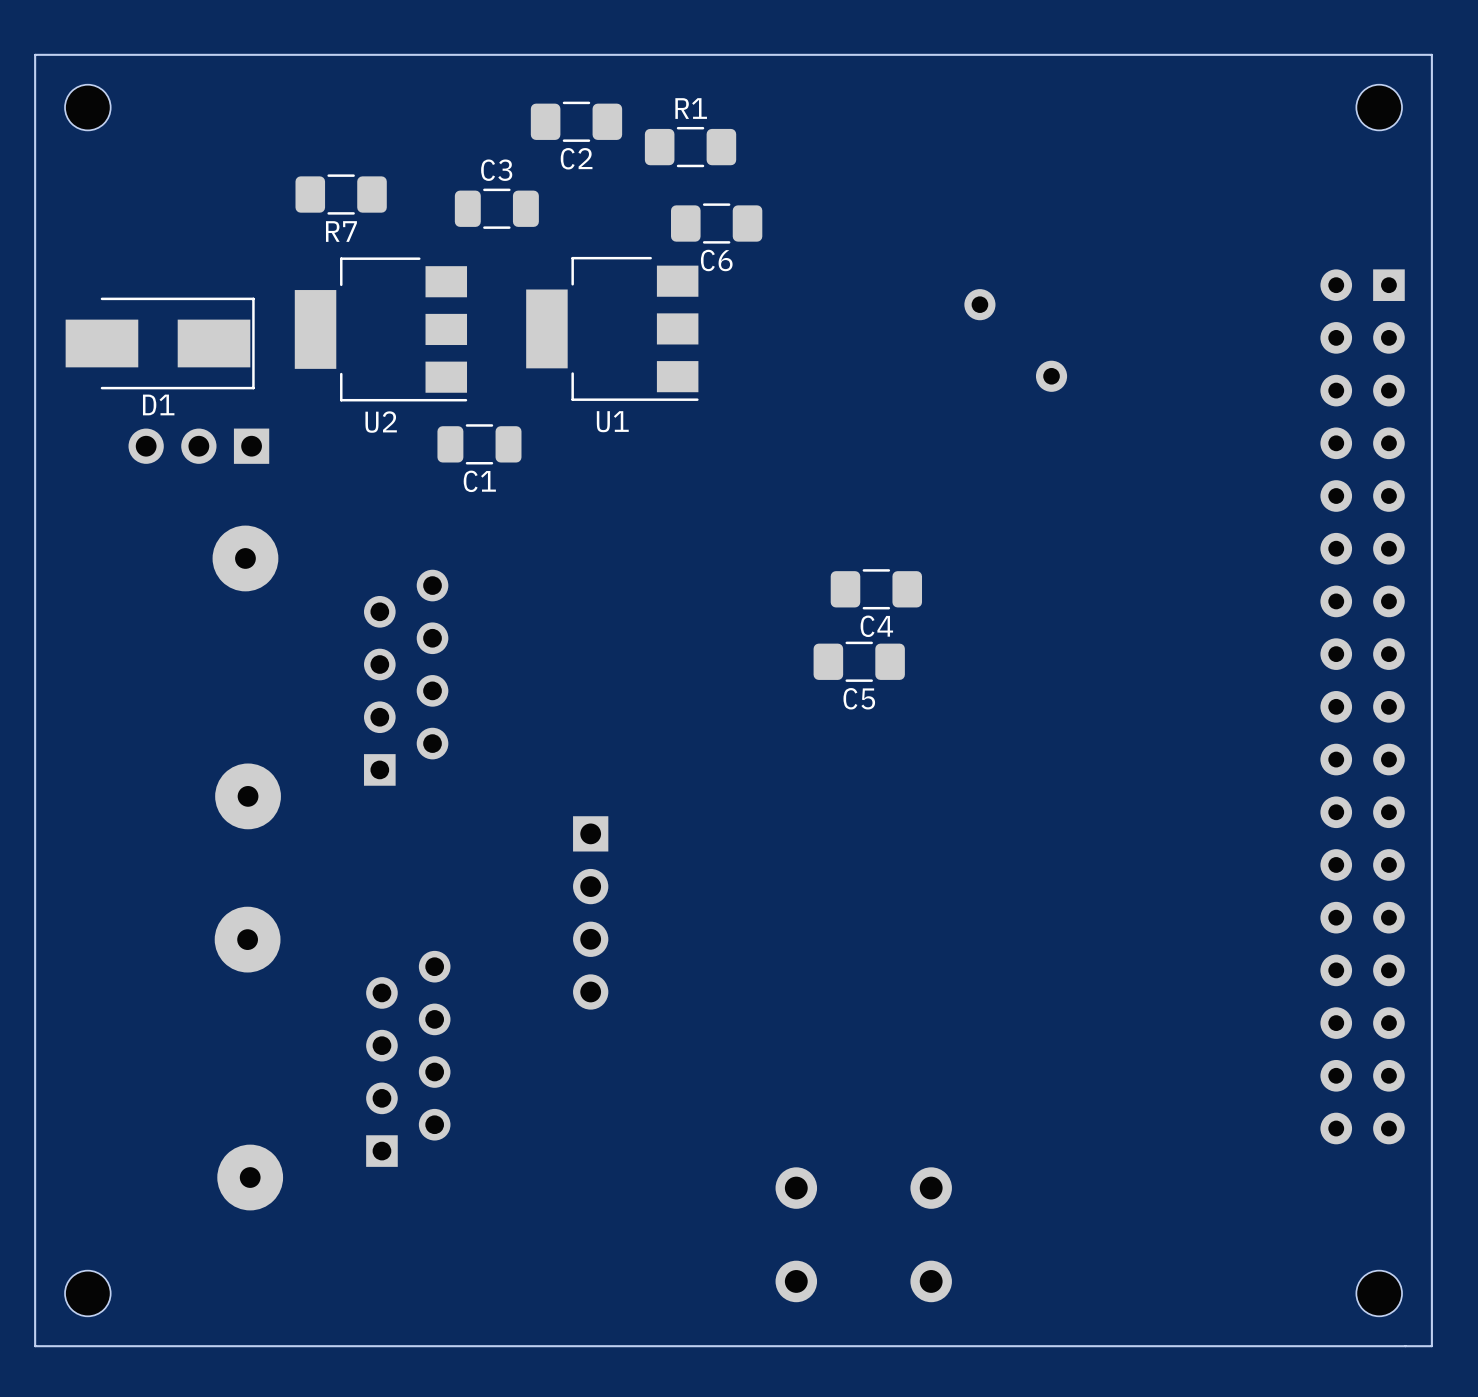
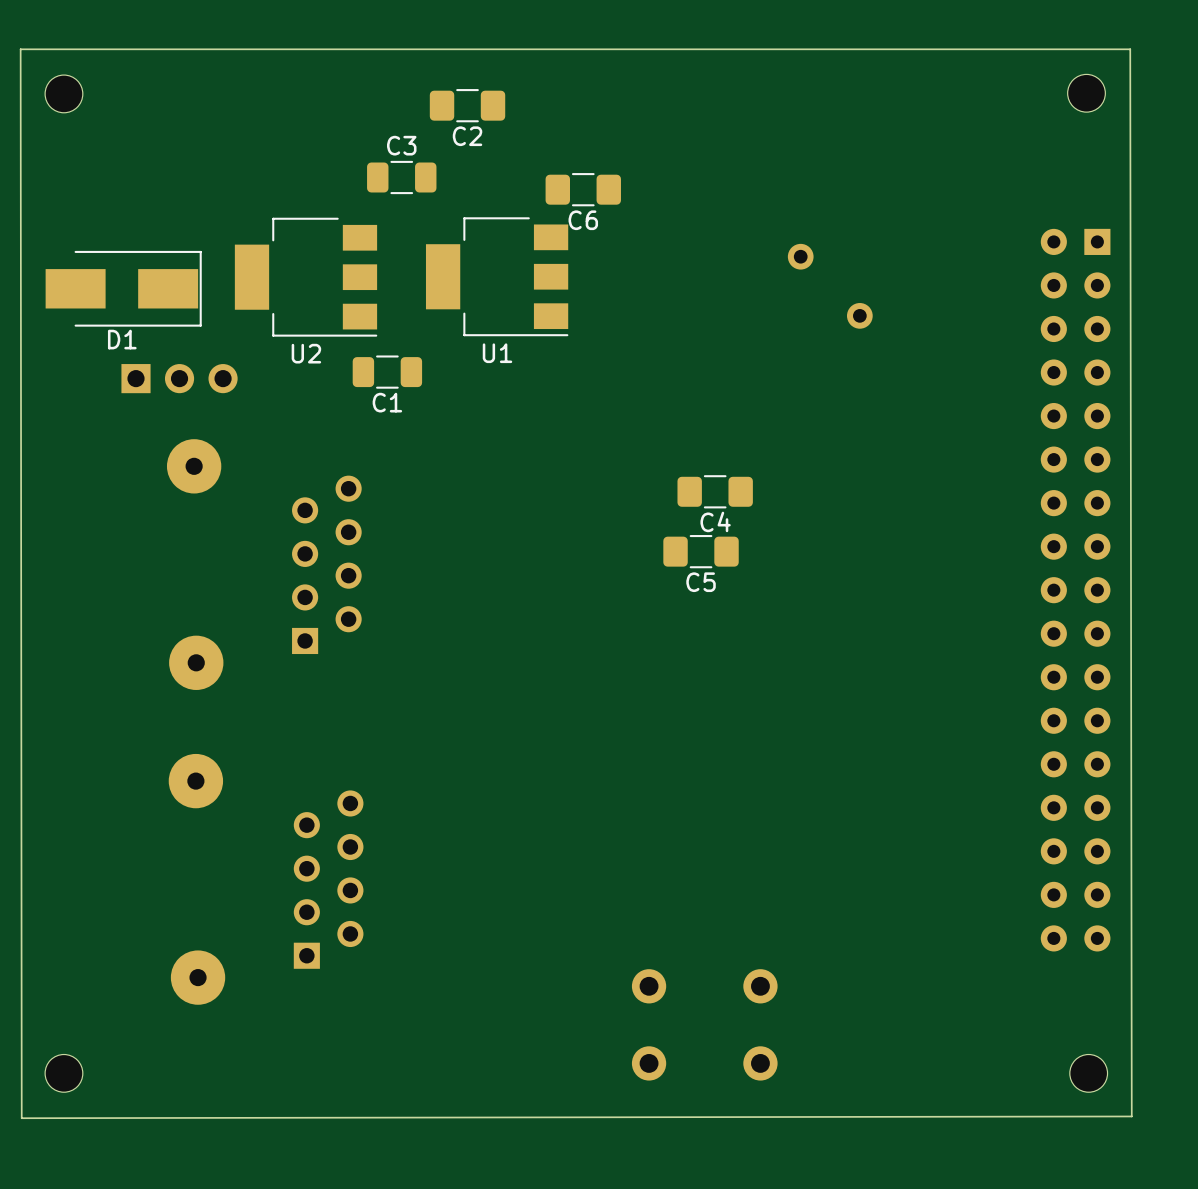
board edge: (1431, 54) (1431, 1346) (35, 1346) (35, 54) (1431, 54) -> (1130, 49) (1131, 1116) (21, 1118) (20, 49) (1130, 49)
part position: (1379, 107) -> (1086, 93)
R1: (690, 147) -> none
R7: (341, 194) -> none
part rotation: 0° (198, 446) -> 180° (179, 378)
part position: (1362, 706) -> (1075, 590)
part: (590, 912) -> none
part position: (1379, 1293) -> (1088, 1073)

